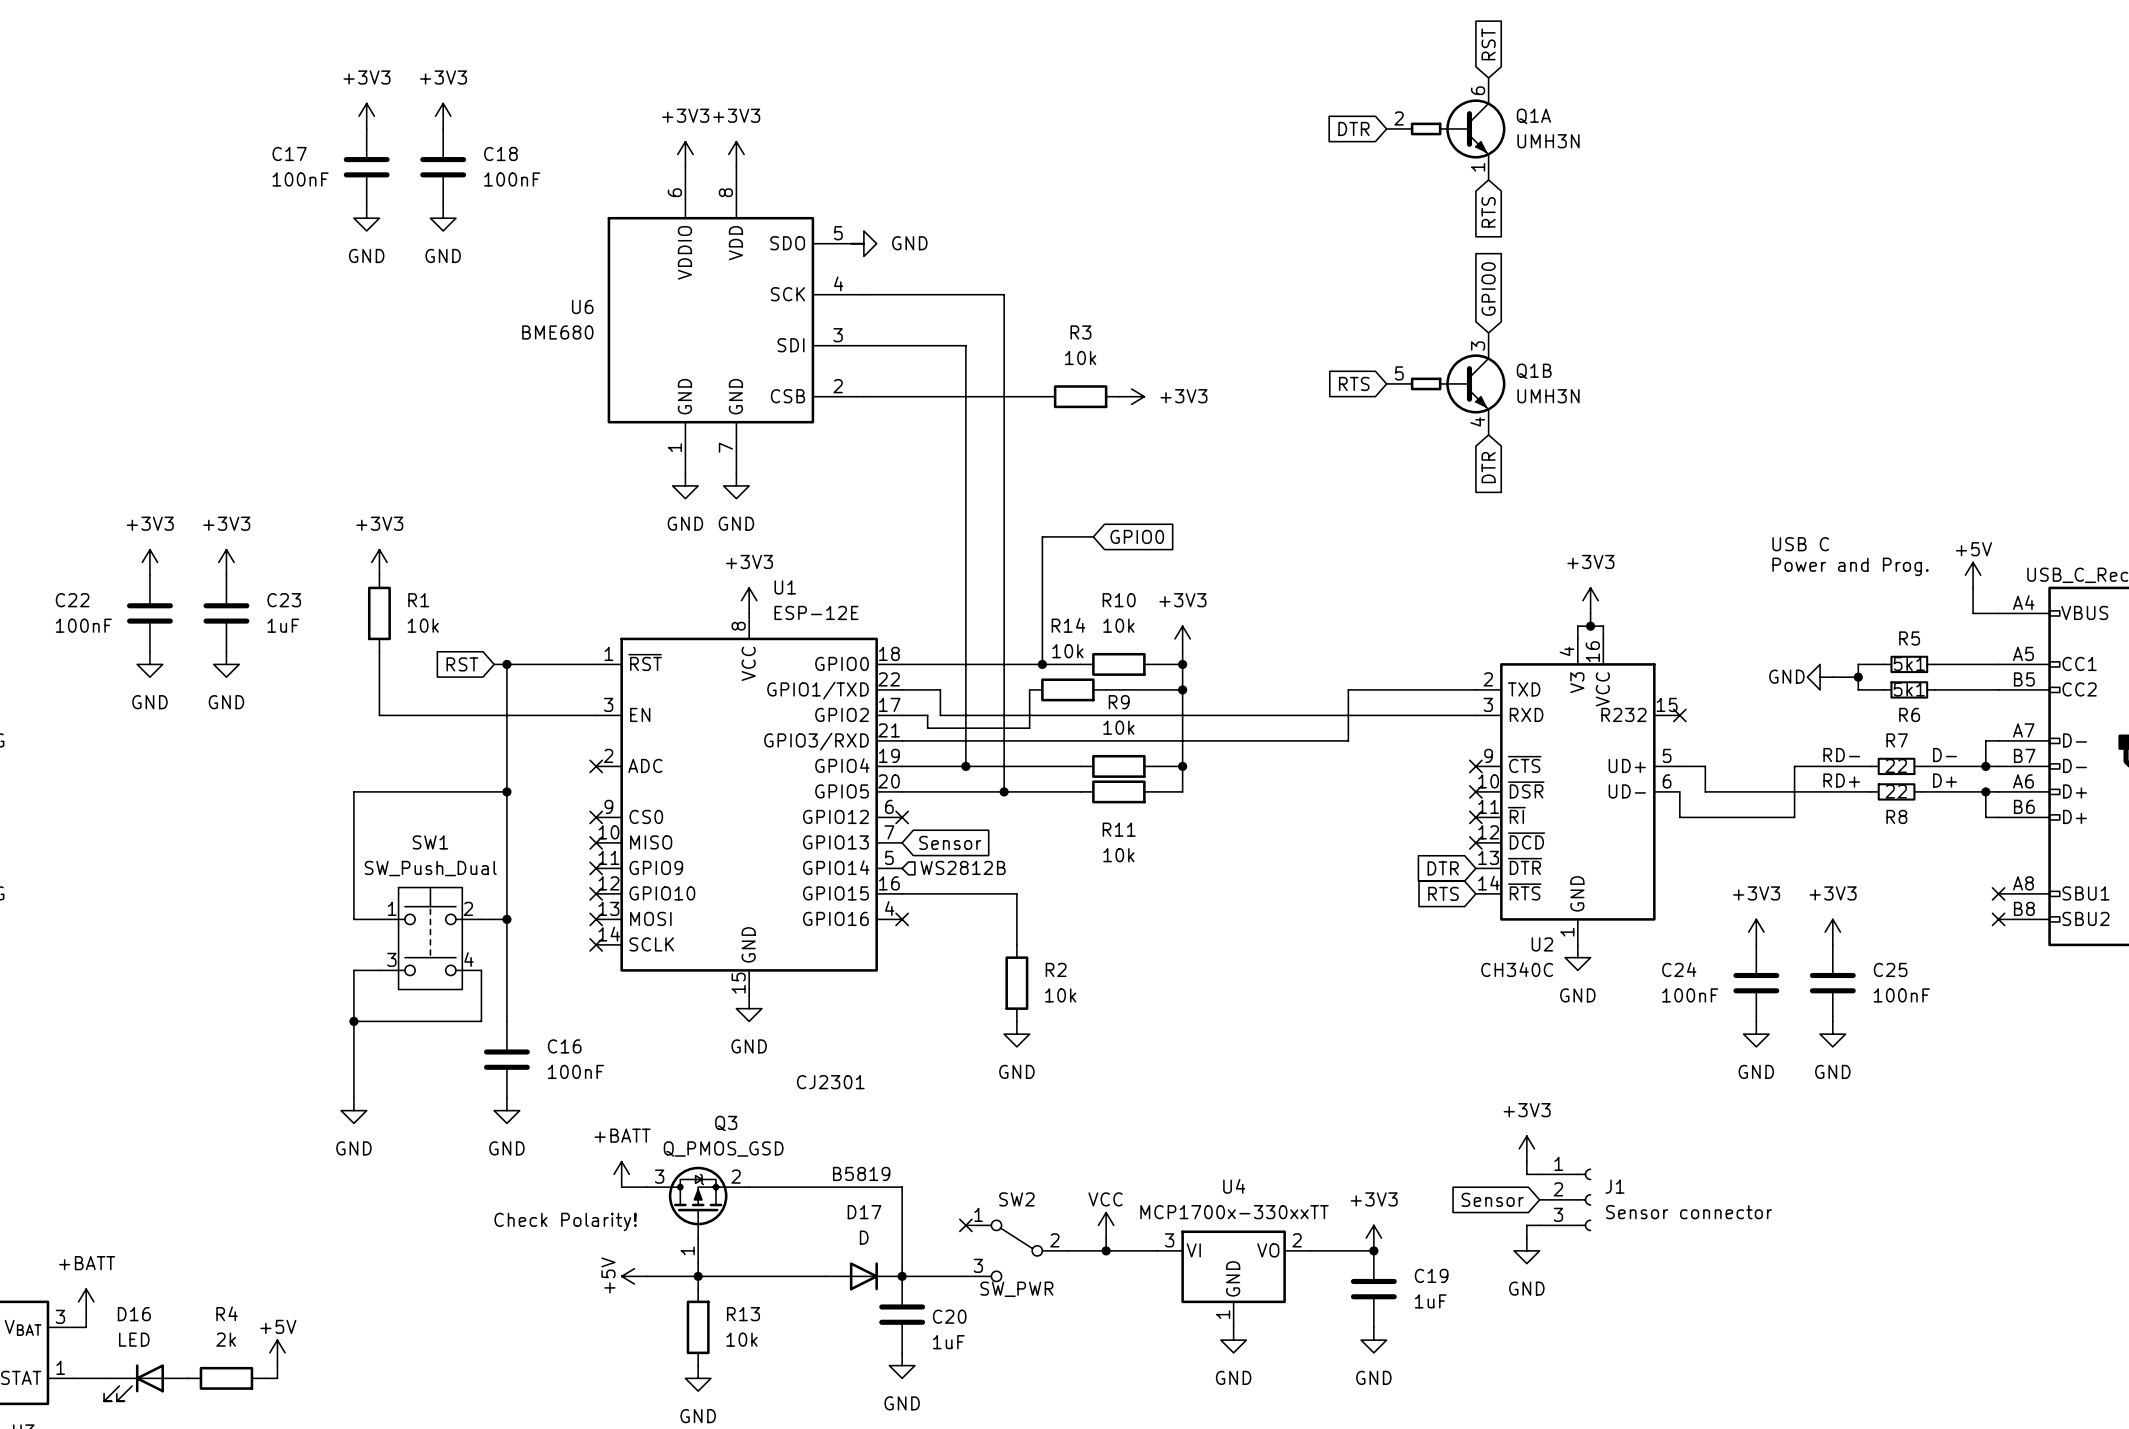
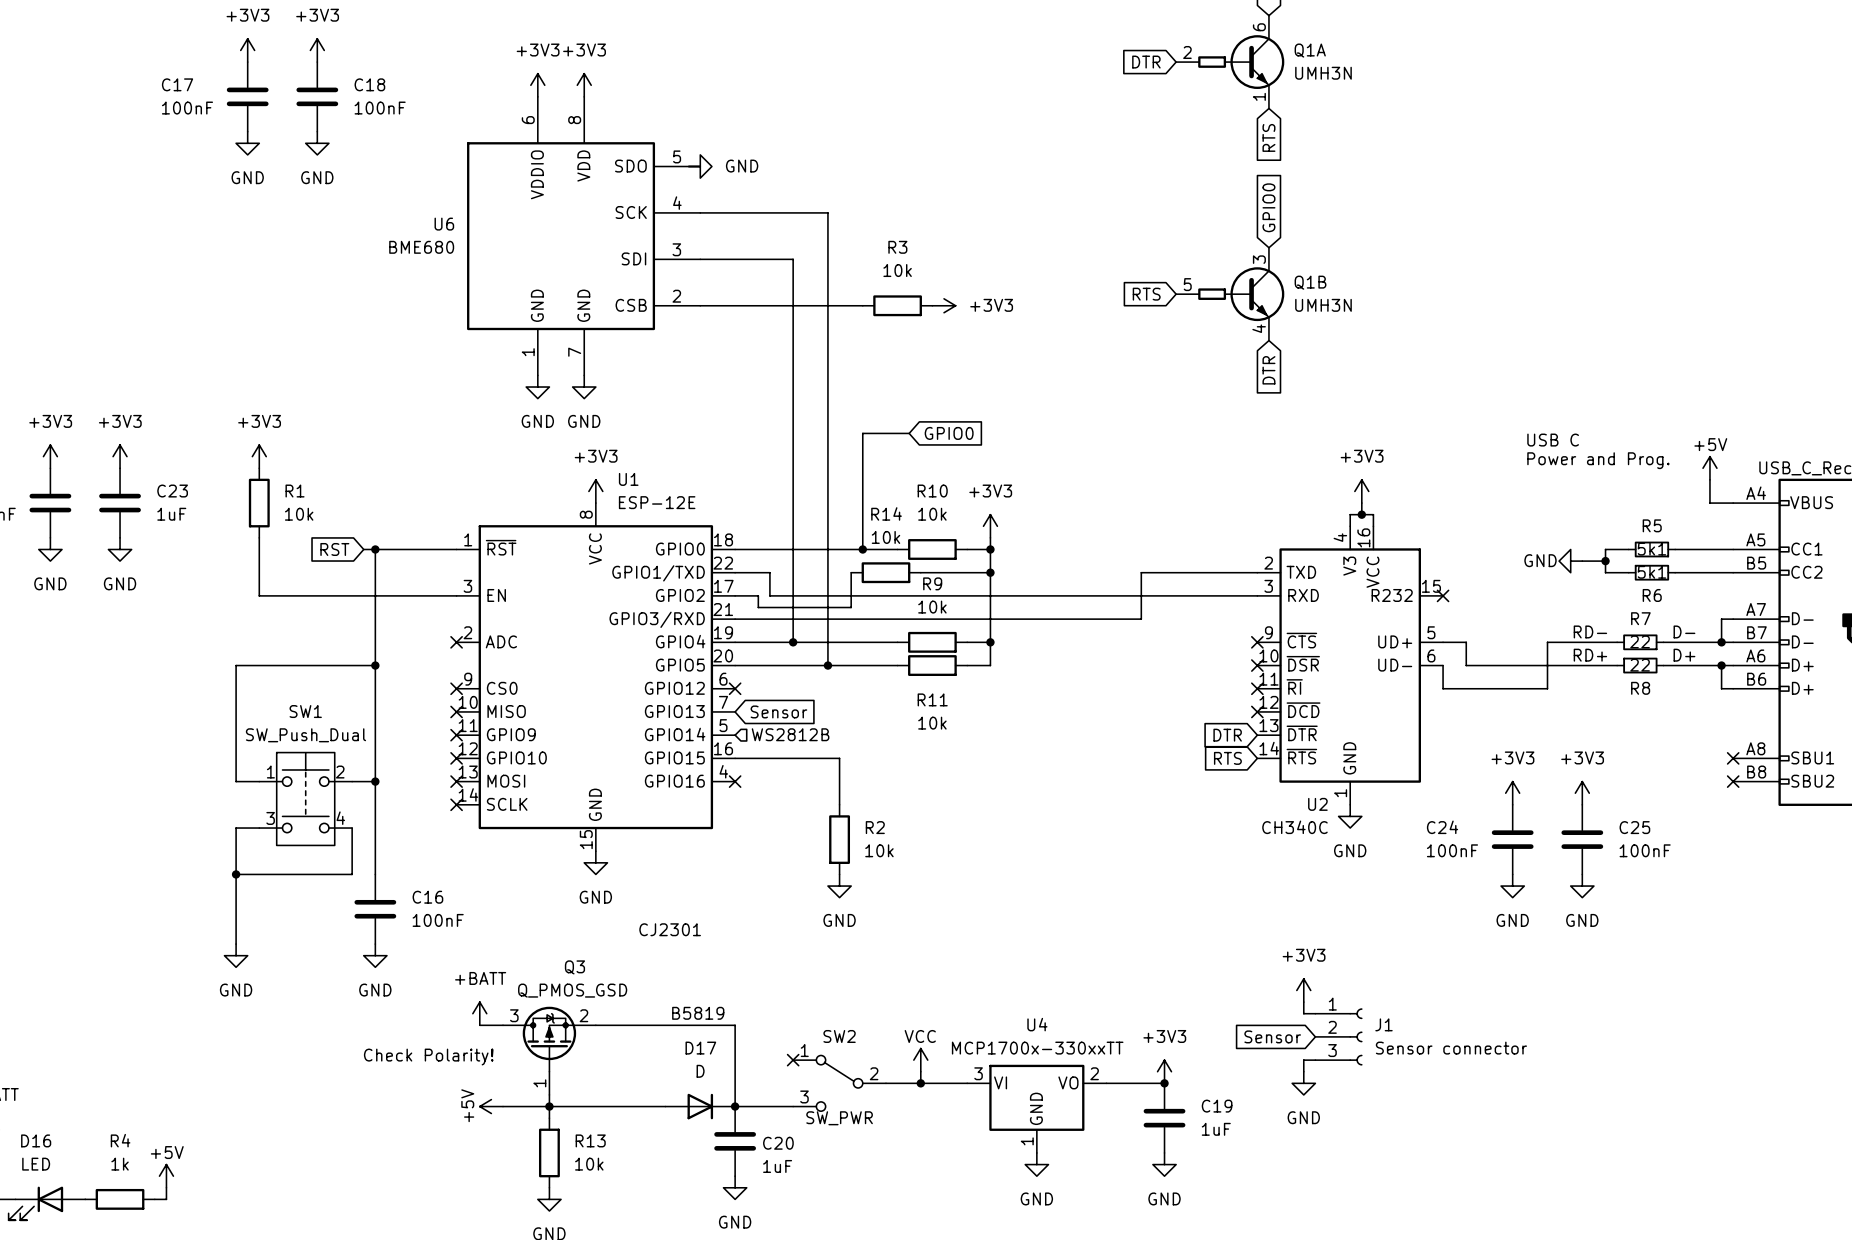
R4 value: 2k (226, 1339) -> 1k (120, 1164)

